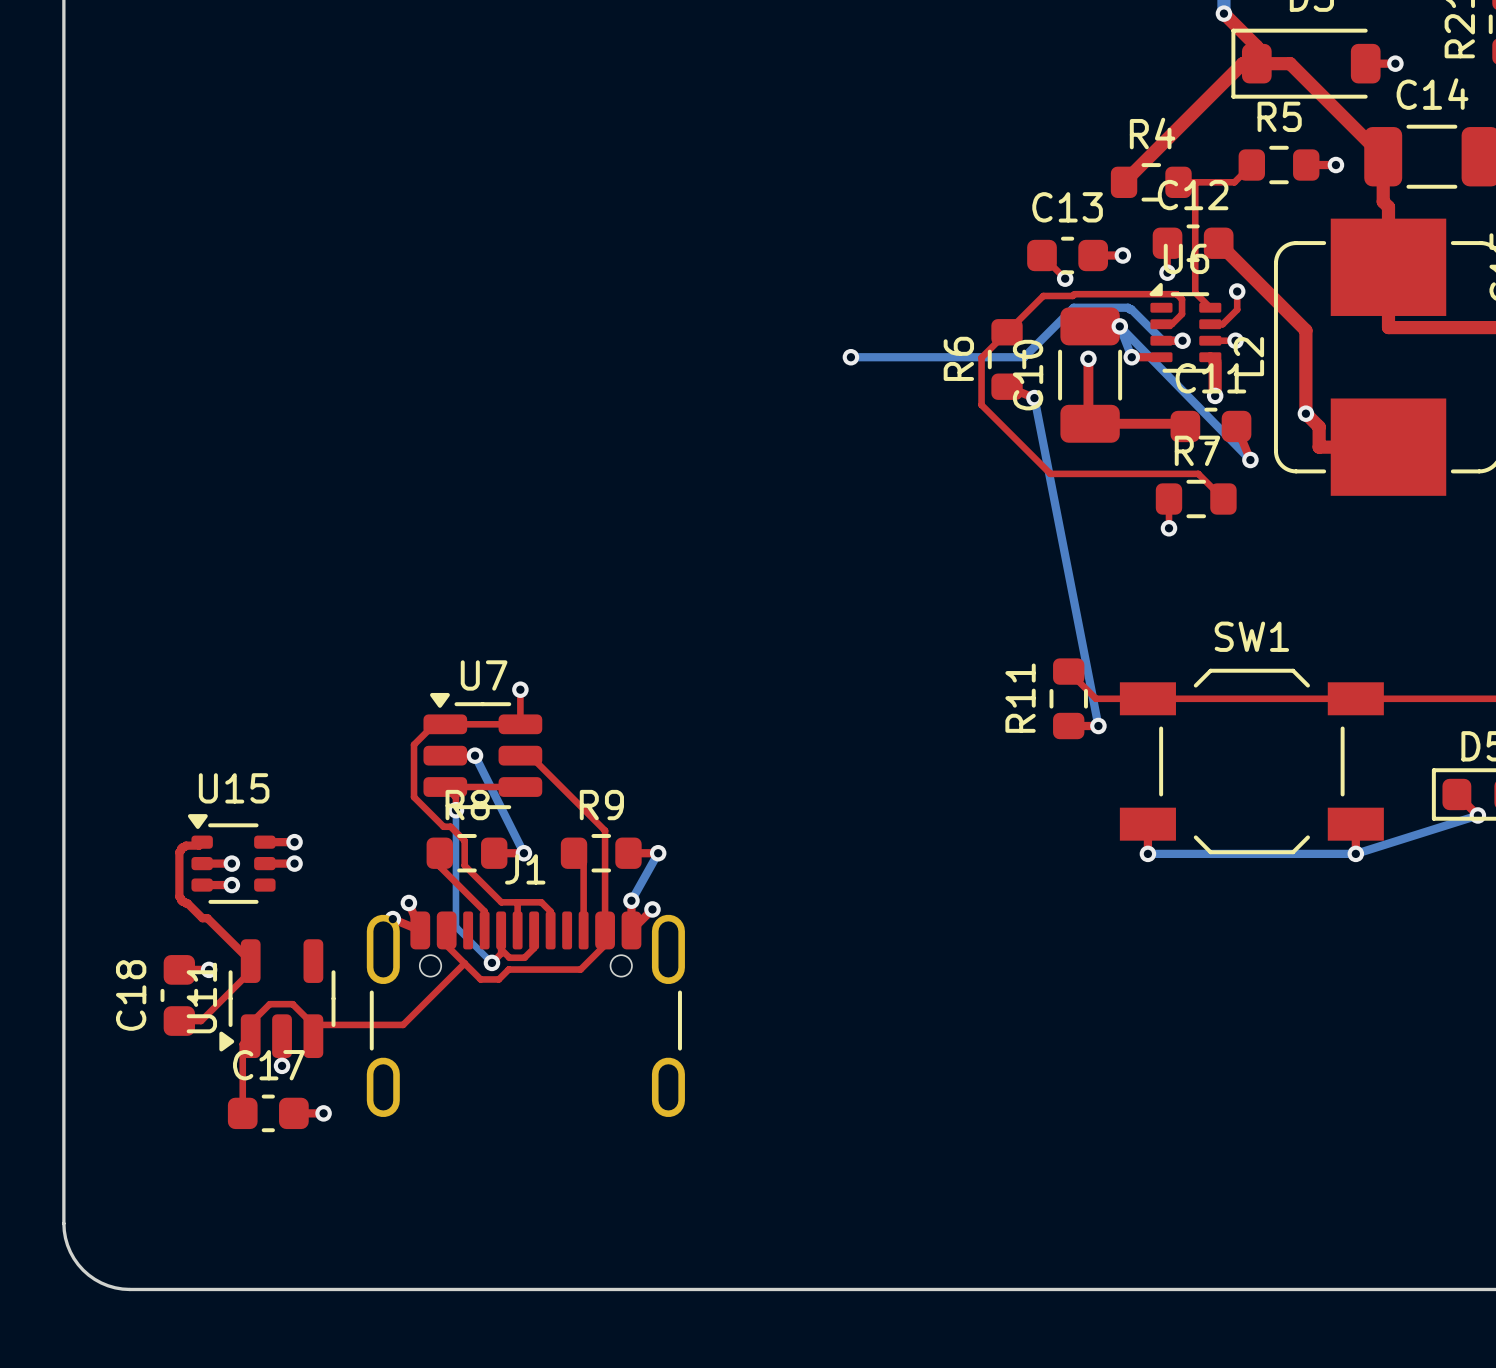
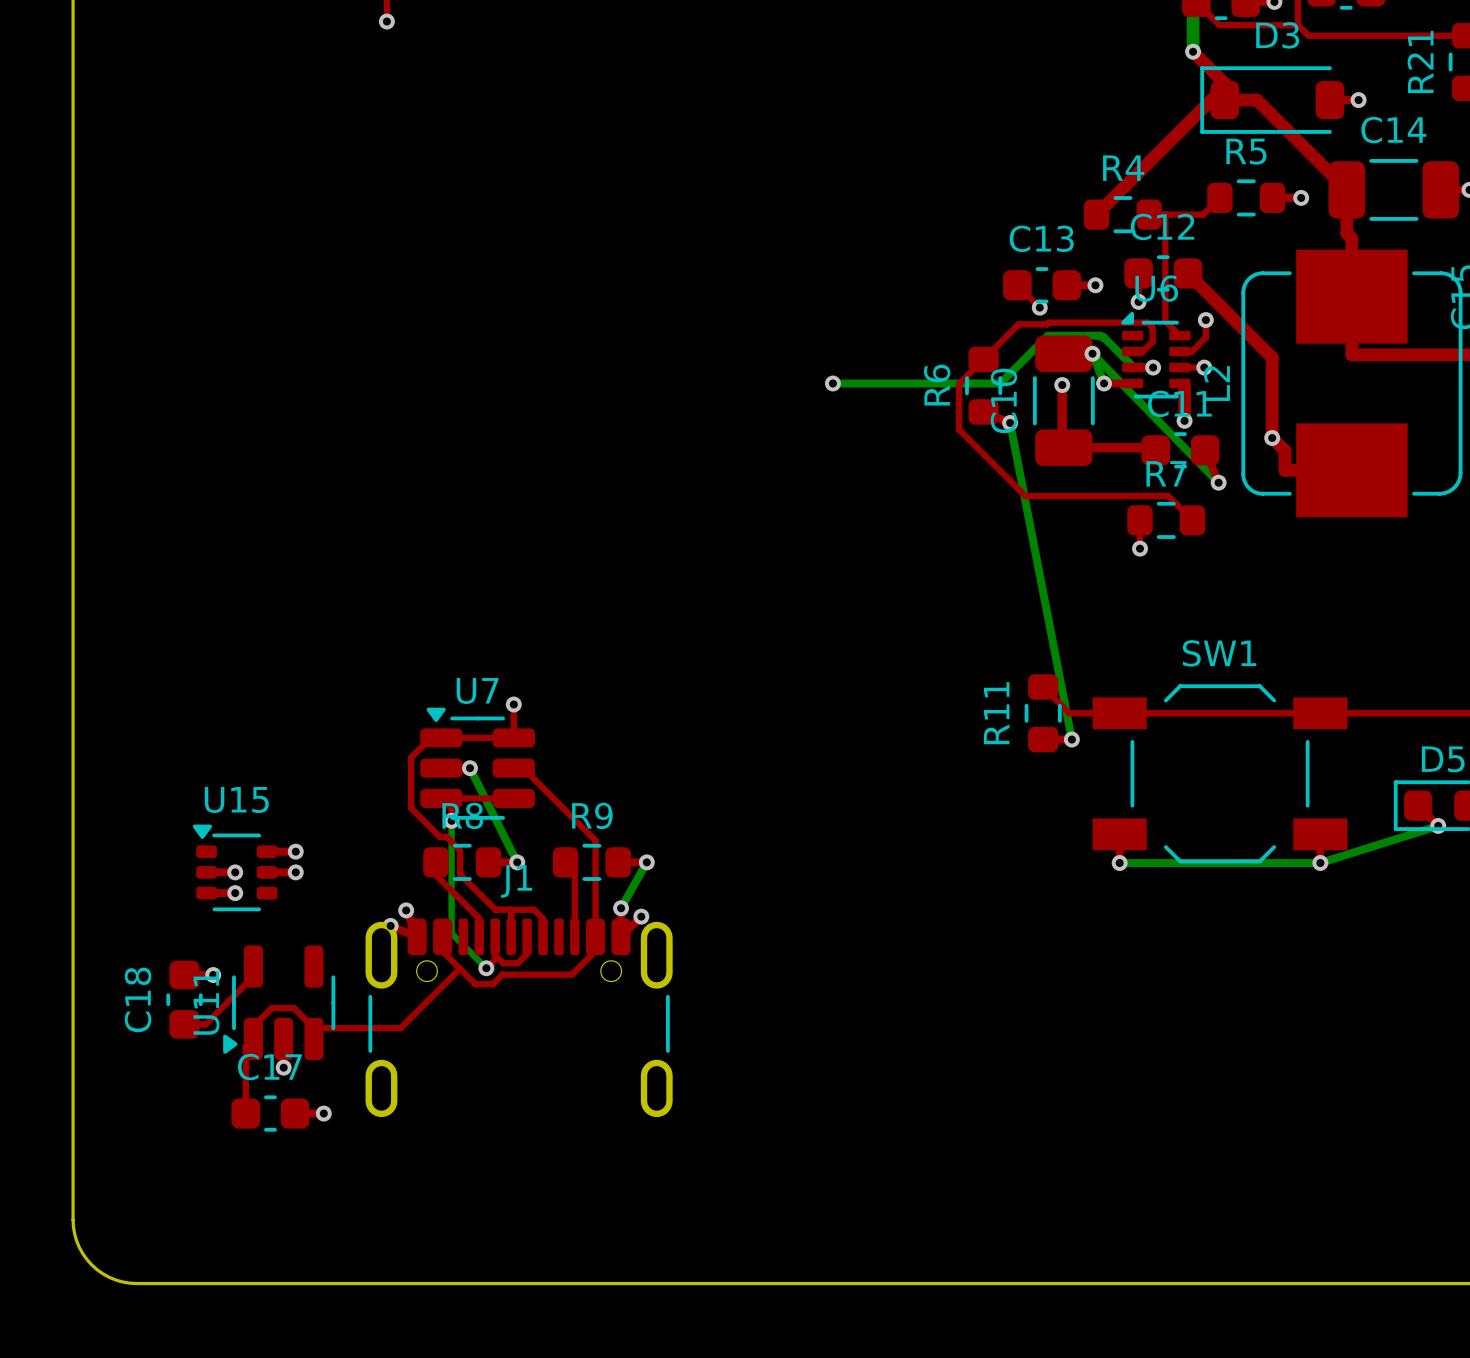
top track: (202, 842) (199, 845) (185, 845) (179, 852) (179, 896) (202, 918) (207, 918) (250, 961) -> none

